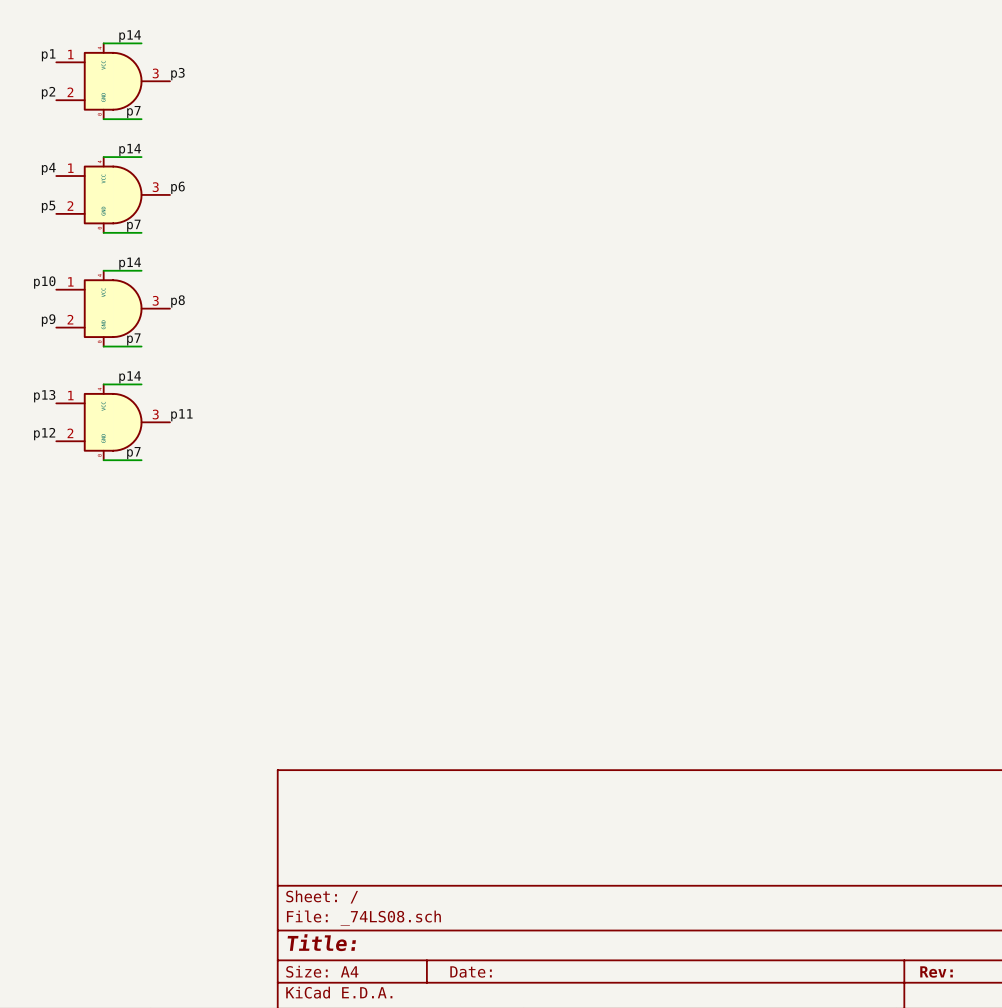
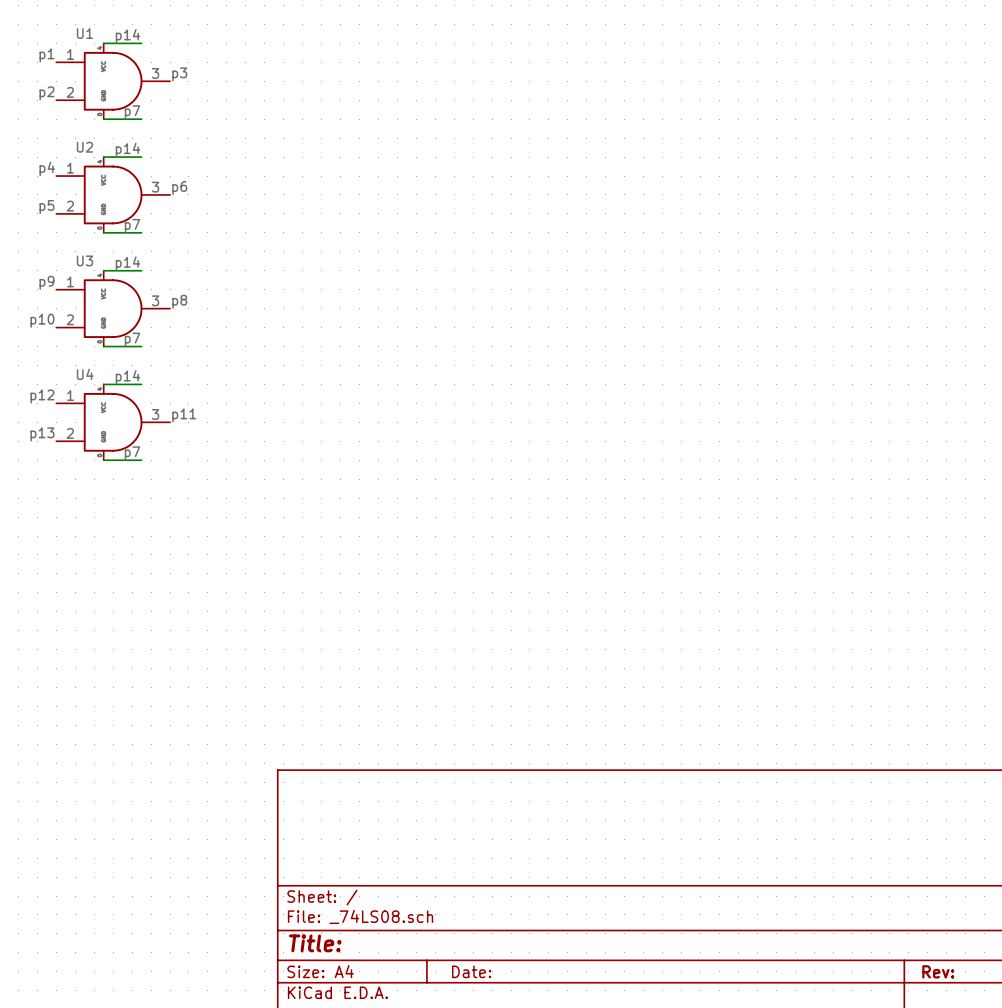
U1 name: none -> U1 (84, 33)
U2 name: none -> U2 (84, 147)
U3 name: none -> U3 (84, 260)
label: p10 (44, 282) -> p9 (47, 282)
label: p9 (48, 320) -> p10 (42, 320)
U4 name: none -> U4 (85, 374)
label: p13 (44, 396) -> p12 (42, 396)
label: p12 (44, 434) -> p13 (42, 434)

